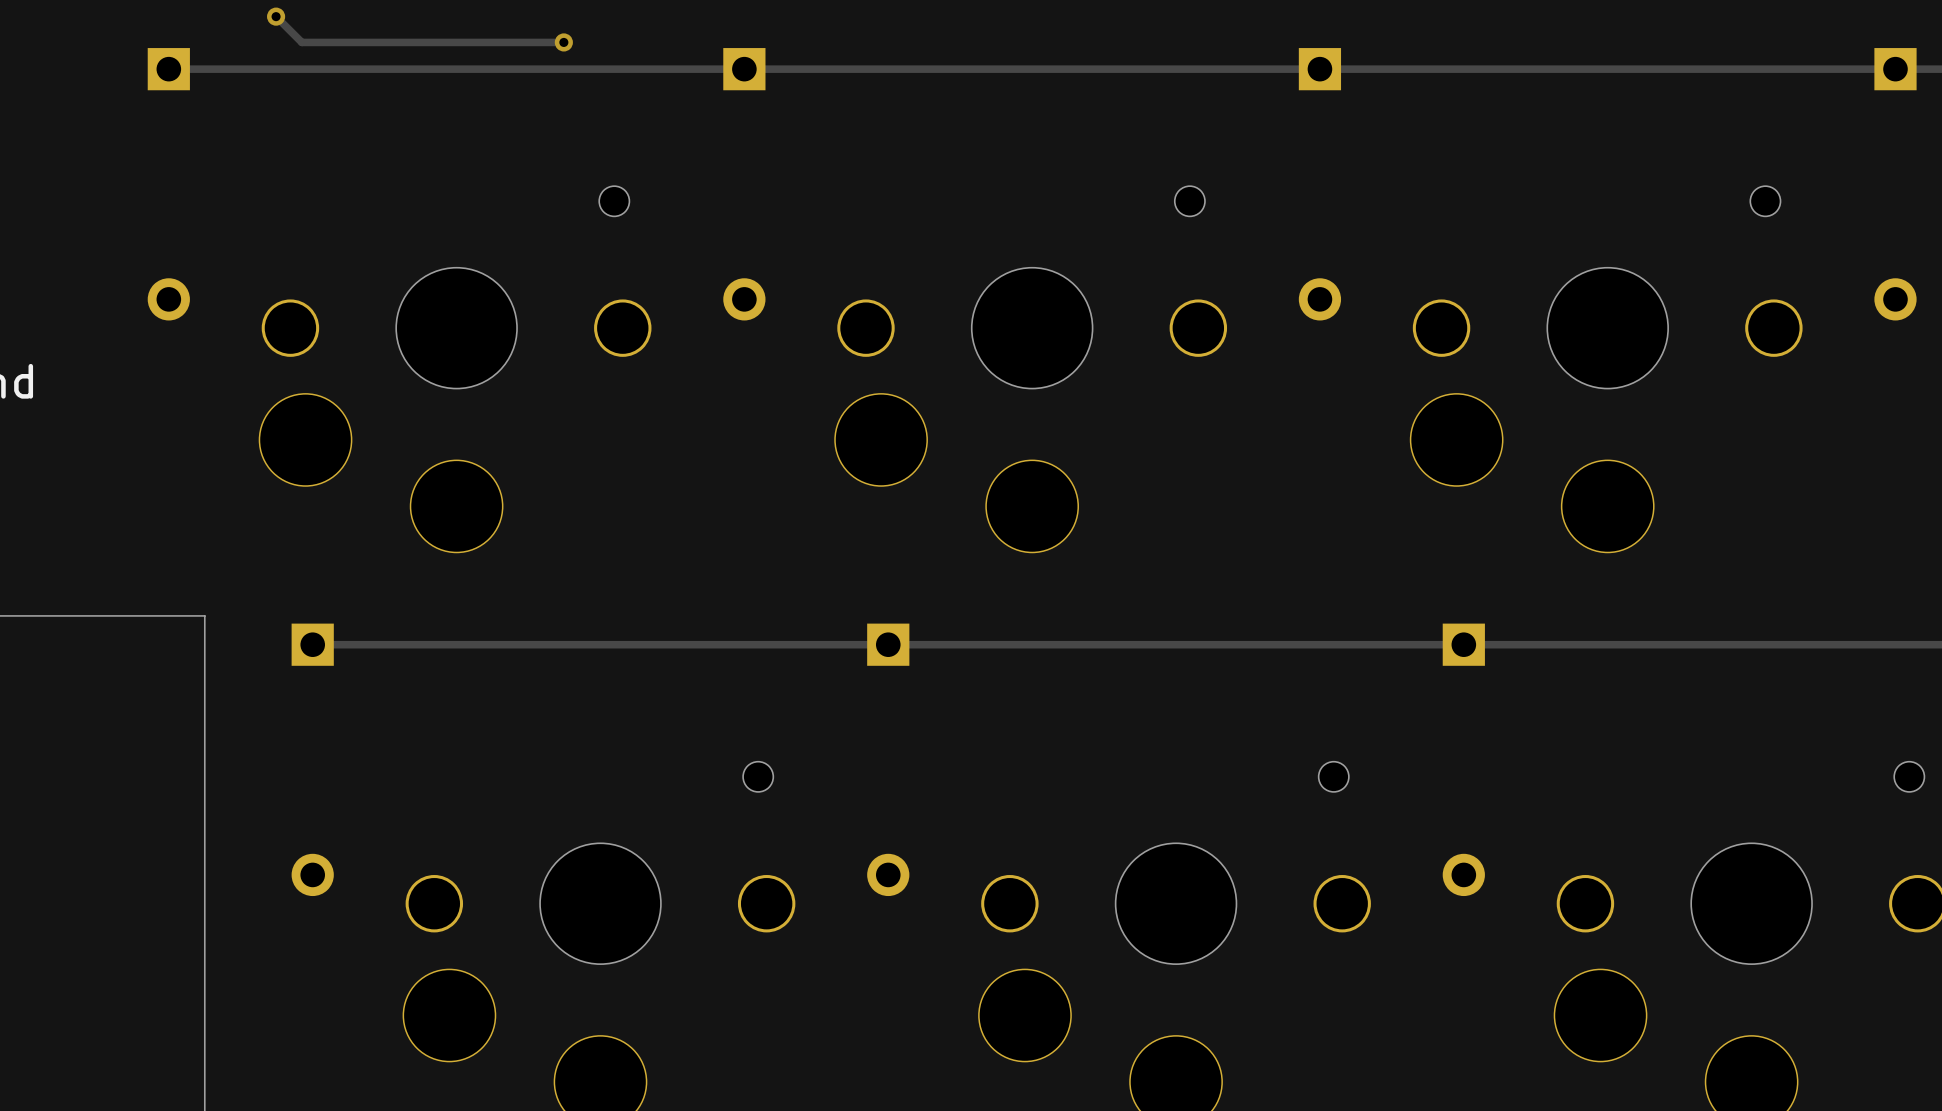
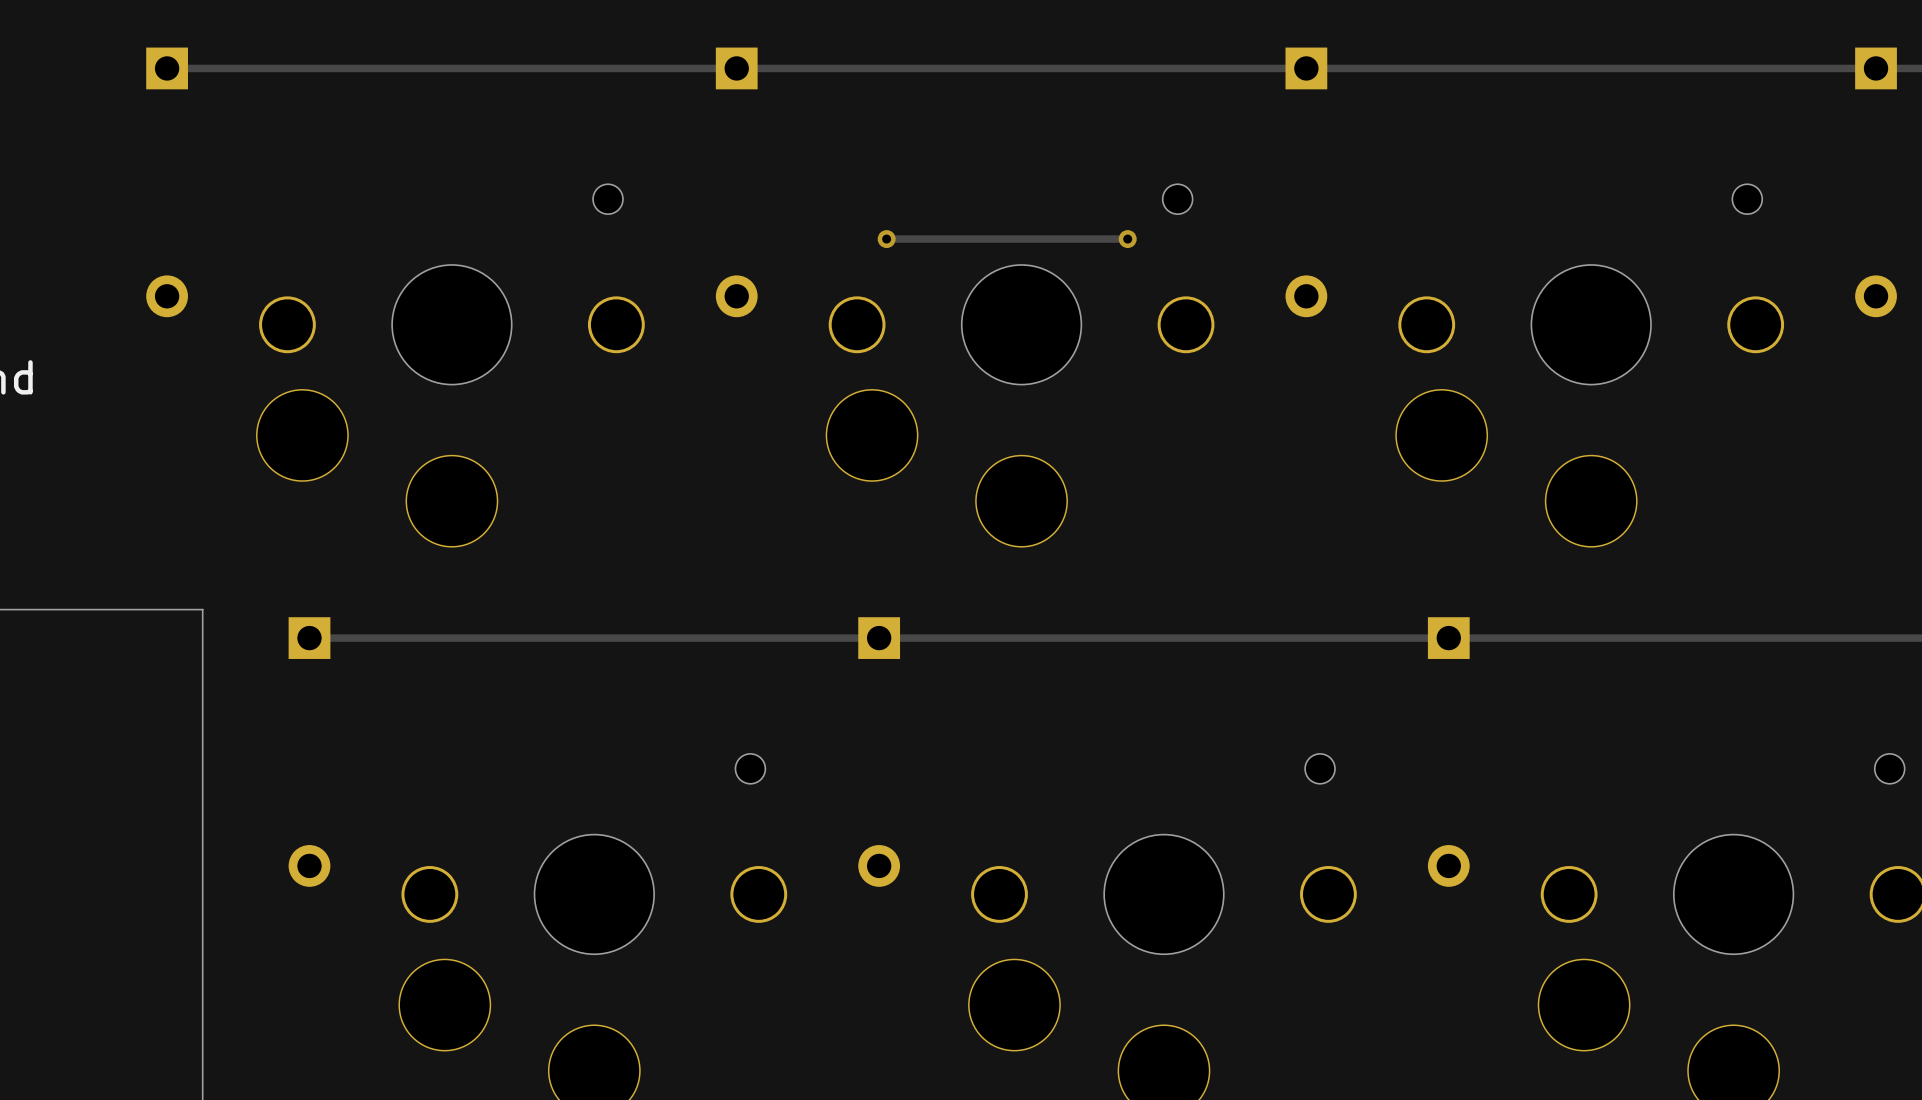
track: (276, 16) (301, 42) (563, 42) -> none
via: (276, 16) -> none
via: (563, 42) -> none
track: none -> (886, 239) (1127, 239)
via: none -> (886, 239)
via: none -> (1127, 239)

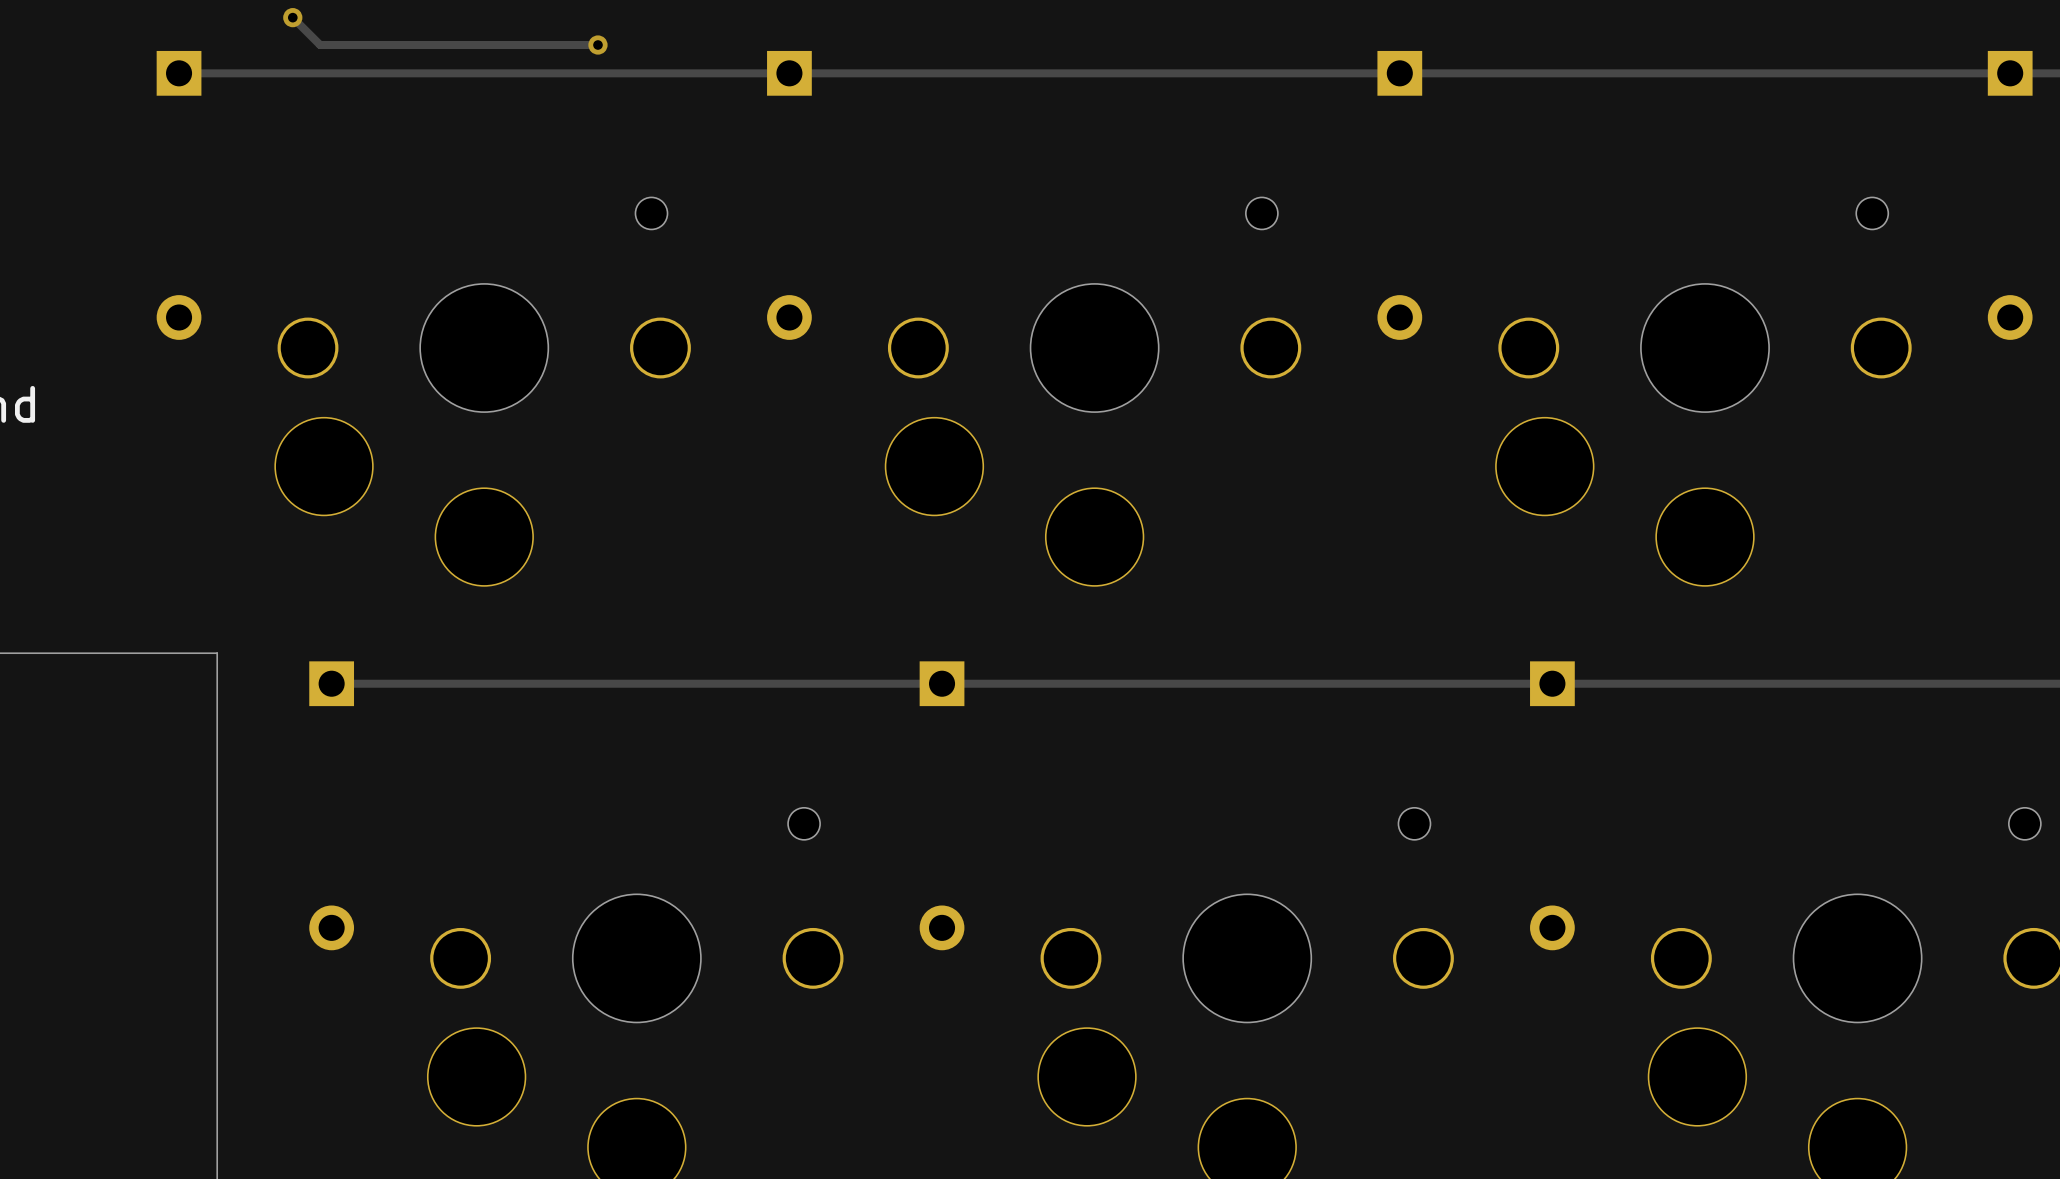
track: none -> (292, 17) (320, 45) (597, 45)
via: none -> (292, 17)
via: none -> (597, 45)
track: (886, 239) (1127, 239) -> none
via: (886, 239) -> none
via: (1127, 239) -> none

